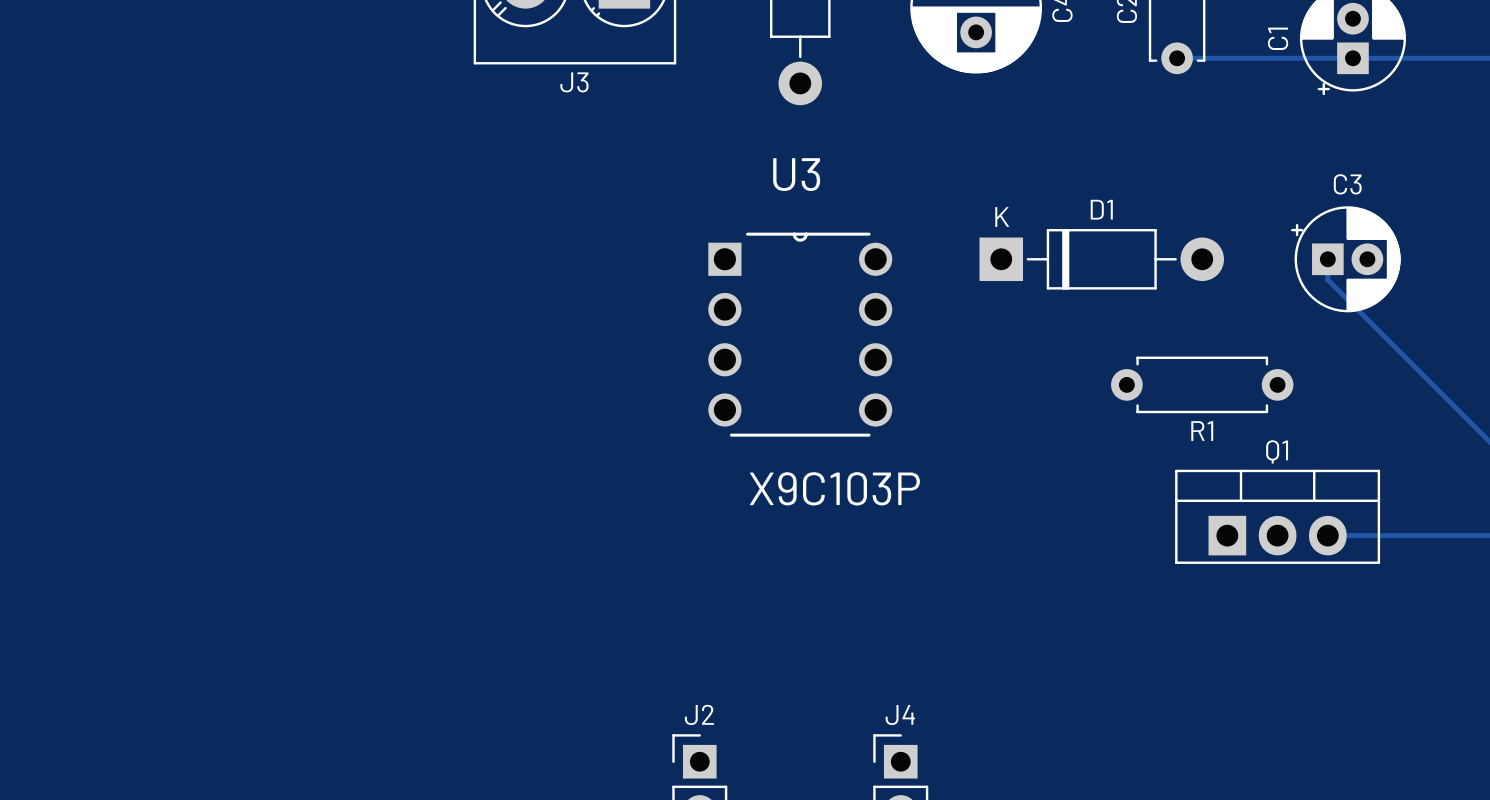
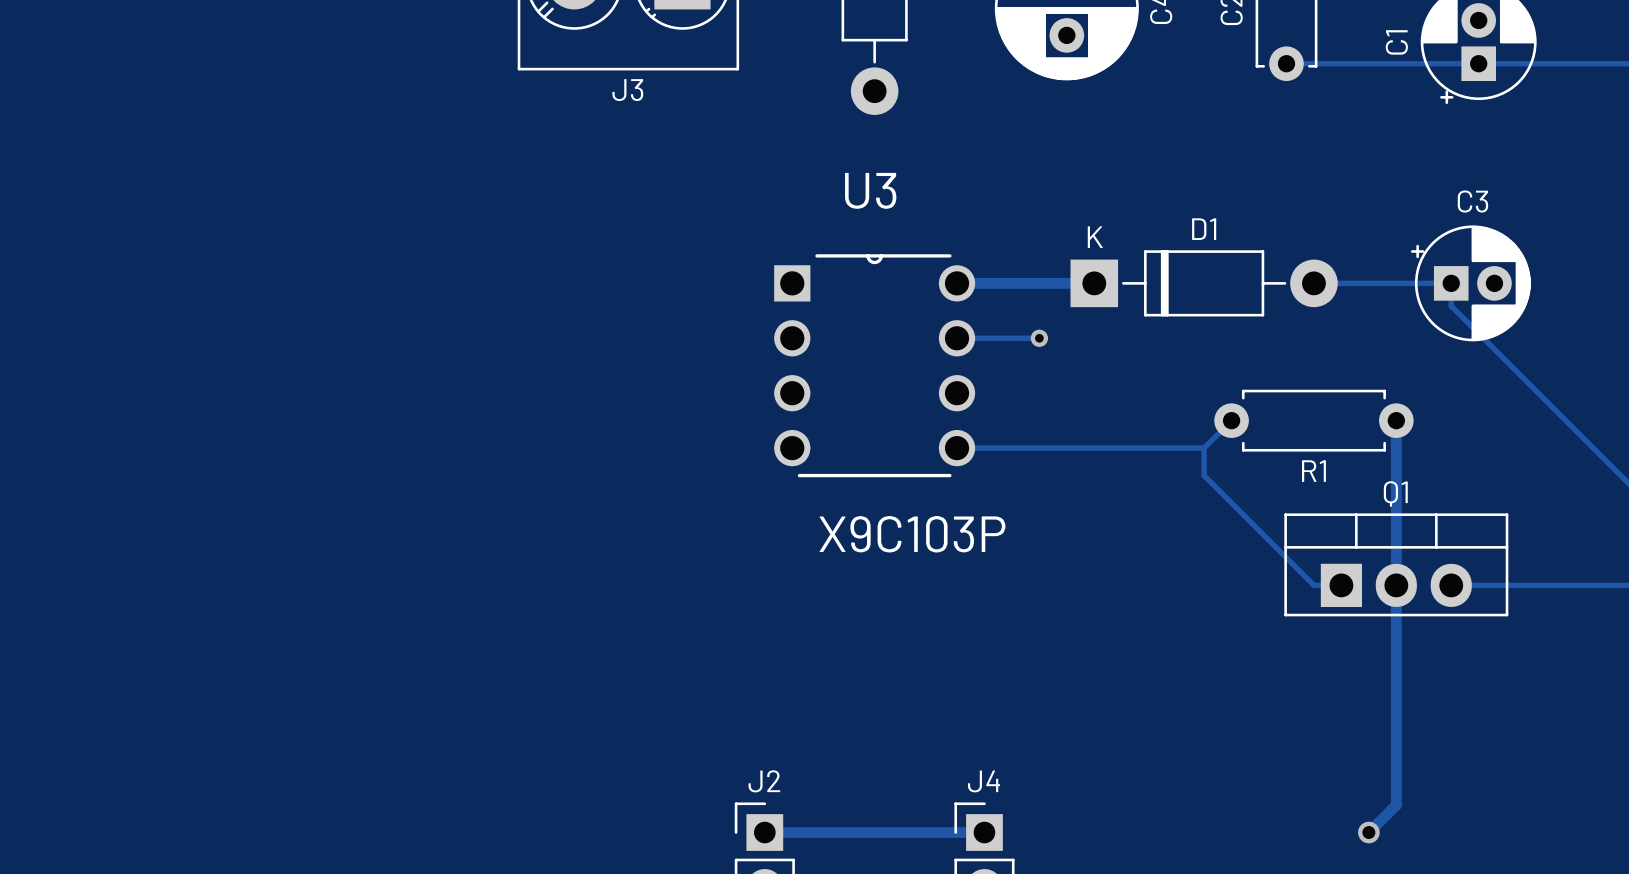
track: none -> (957, 283) (1094, 283)
track: none -> (1313, 283) (1451, 283)
track: none -> (957, 338) (1039, 338)
via: none -> (1039, 338)
track: none -> (1231, 420) (1204, 448)
track: none -> (1396, 420) (1396, 805) (1368, 832)
track: none -> (957, 448) (1204, 448)
track: none -> (1204, 448) (1204, 475) (1313, 585) (1341, 585)
track: none -> (764, 832) (984, 832)
via: none -> (1368, 832)

